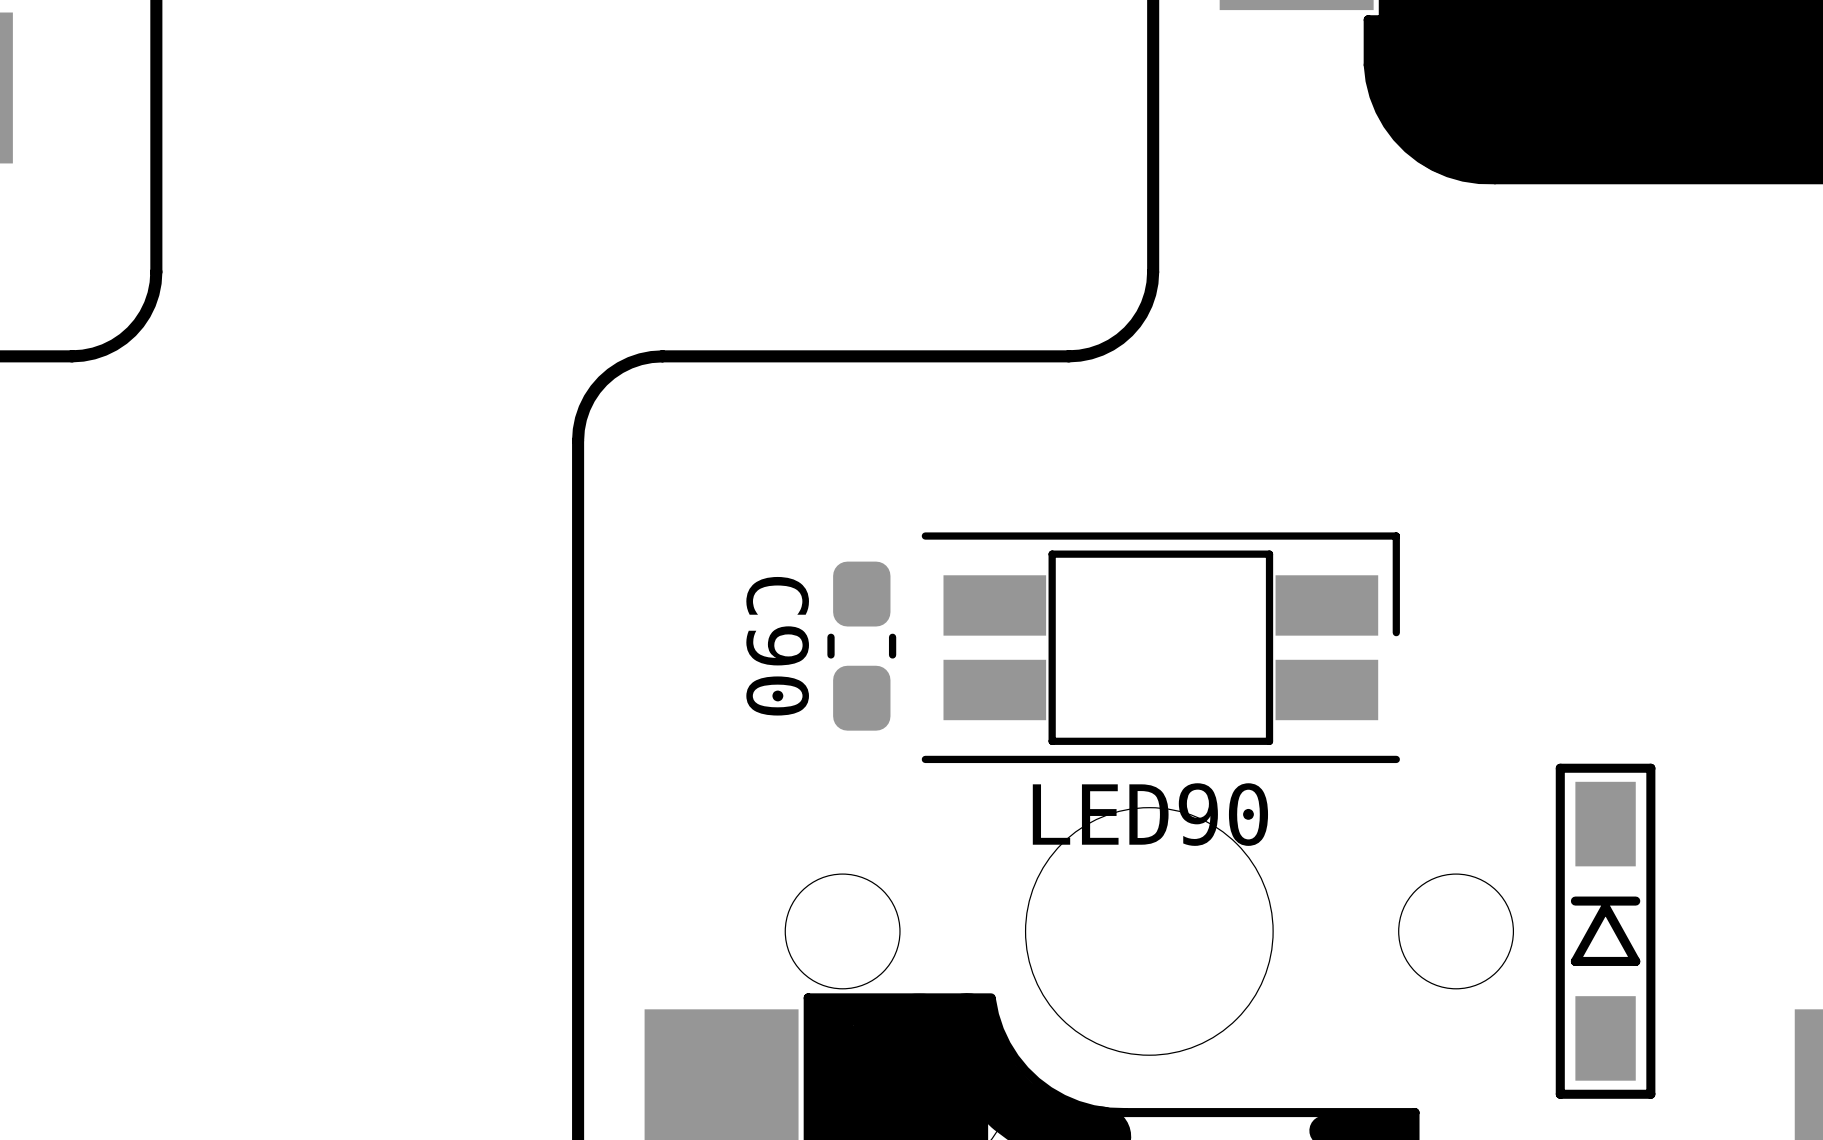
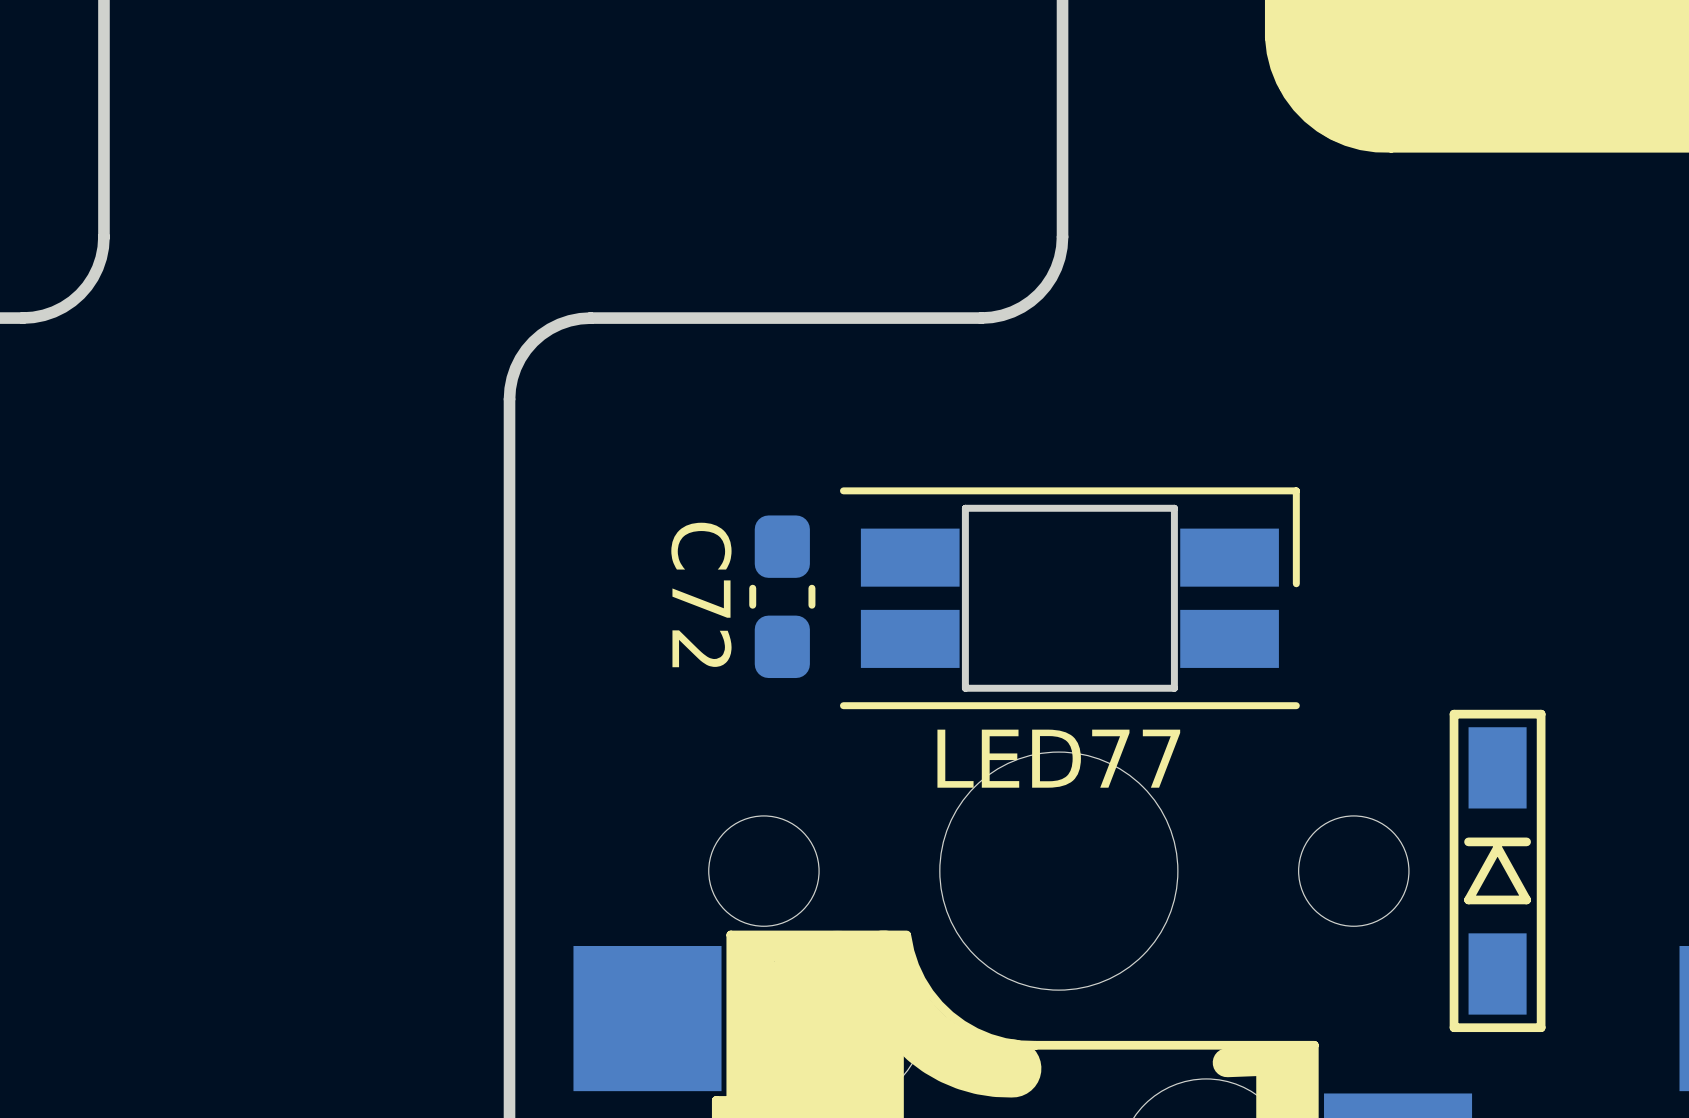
C90 name: C90 (777, 646) -> C72 (701, 594)
LED90 name: LED90 (1150, 814) -> LED77 (1058, 758)

